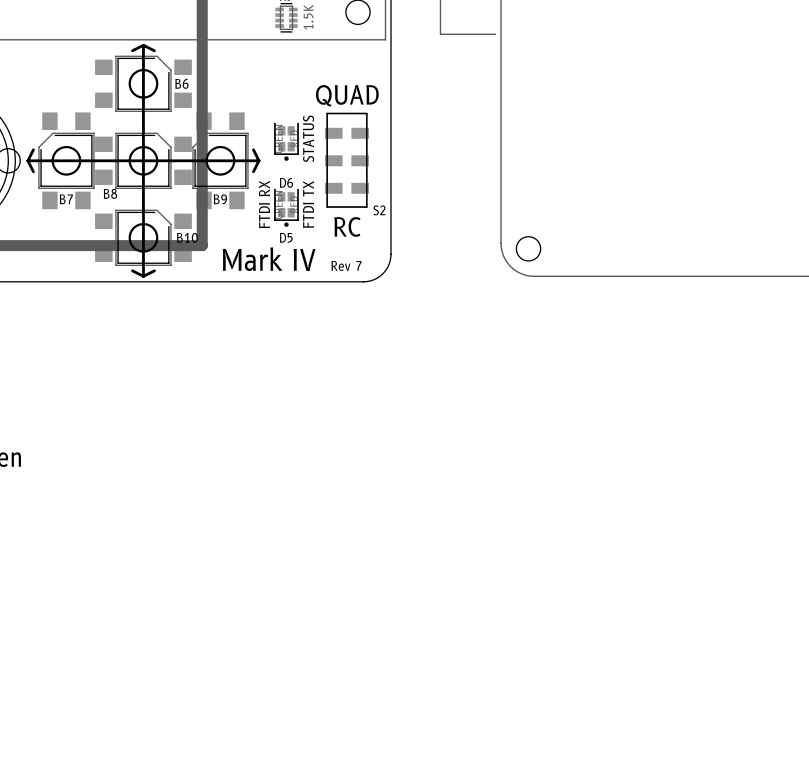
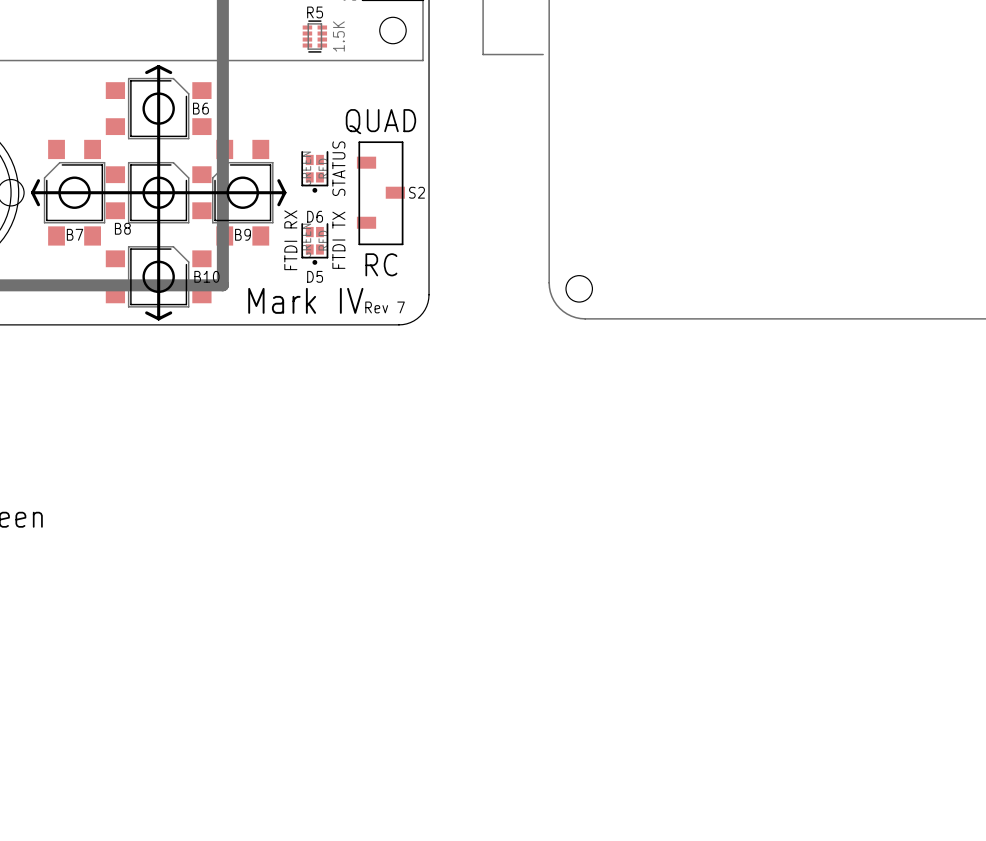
S2 footprint: [324, 112, 369, 208] -> [356, 141, 405, 246]
S2 name position: S2 (379, 210) -> S2 (417, 192)

